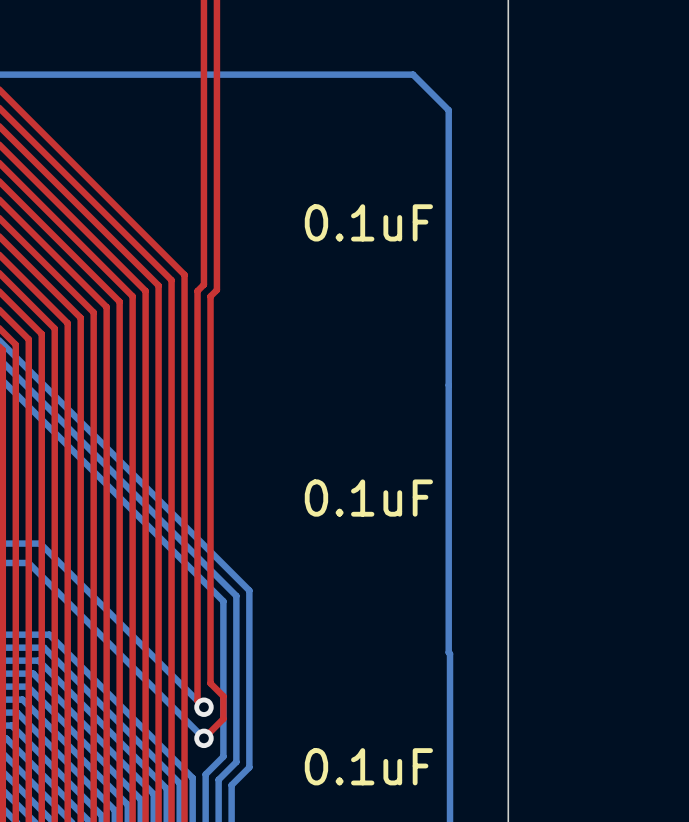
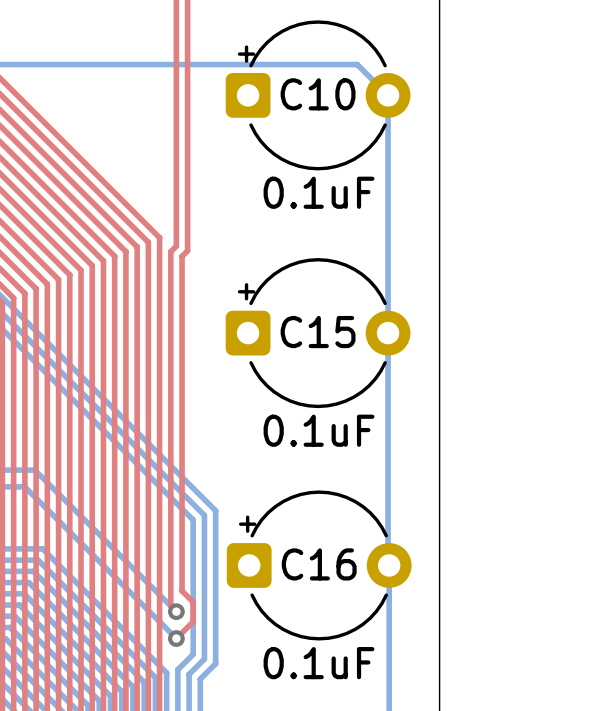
C10: none -> (318, 95)
C15: none -> (318, 333)
C16: none -> (319, 565)

